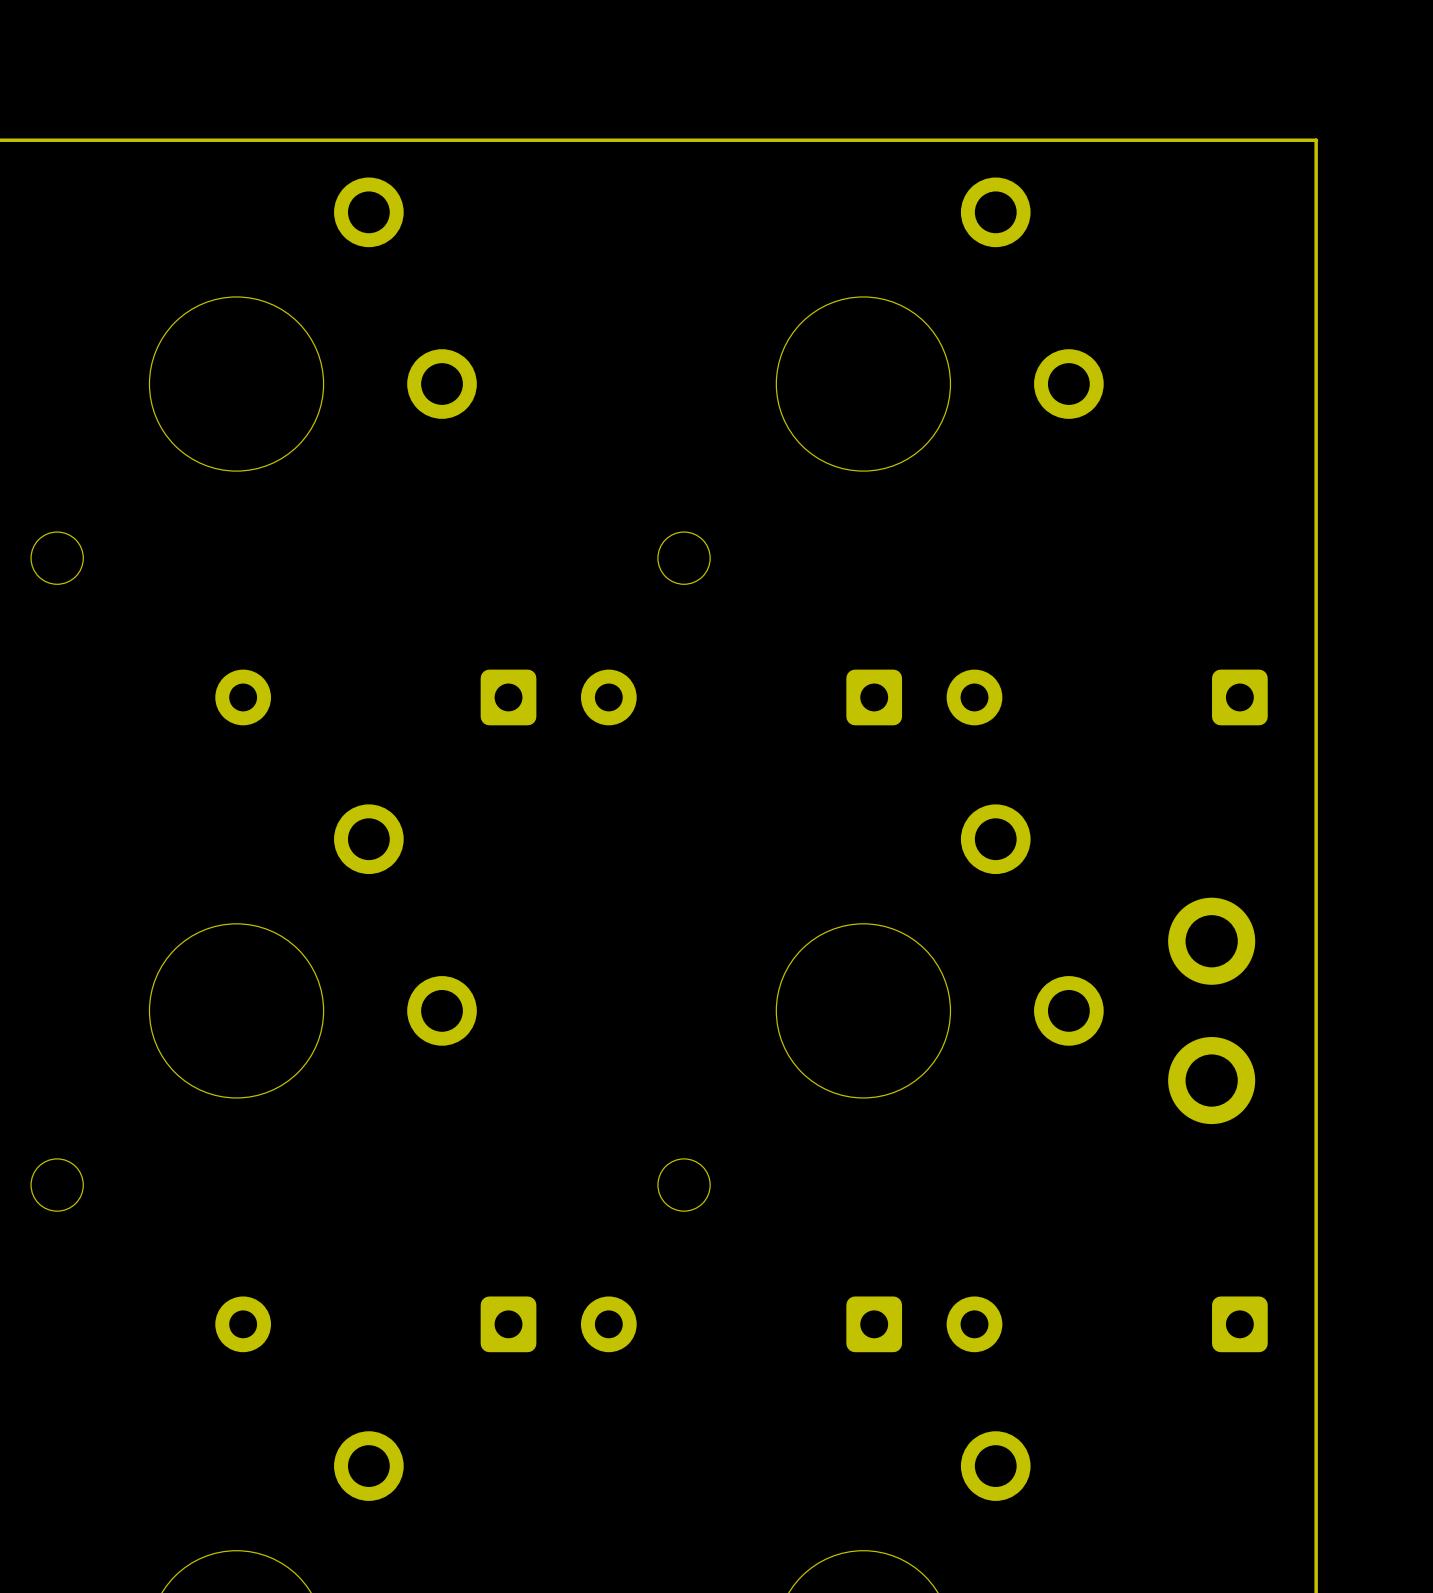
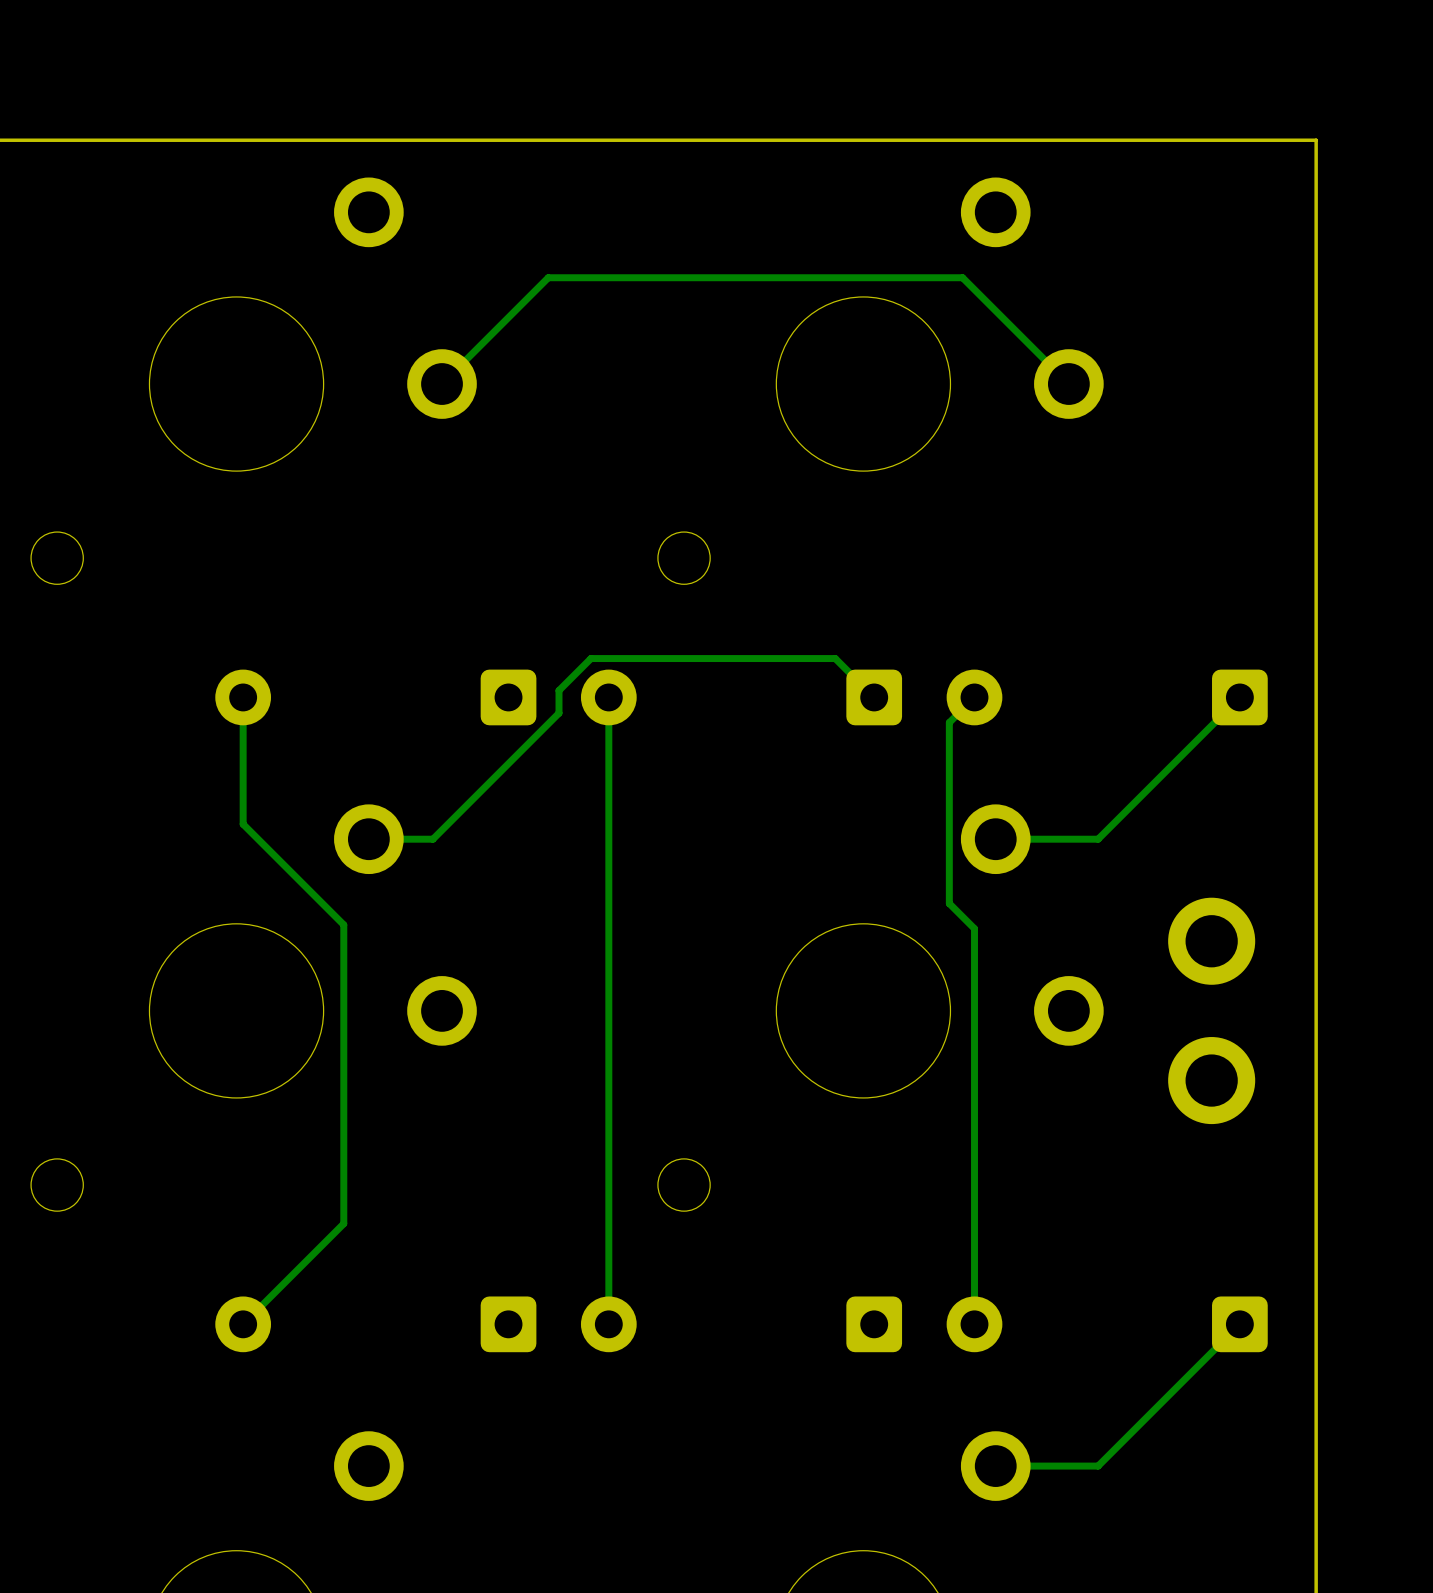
track: none -> (1068, 384) (962, 277) (548, 277) (442, 384)
track: none -> (243, 697) (243, 824) (343, 924) (343, 1223) (243, 1324)
track: none -> (608, 697) (608, 1324)
track: none -> (874, 697) (835, 658) (590, 658) (559, 690) (559, 713) (432, 839) (368, 839)
track: none -> (974, 697) (949, 722) (949, 903) (974, 928) (974, 1324)
track: none -> (1239, 697) (1098, 839) (995, 839)
track: none -> (1239, 1324) (1098, 1466) (995, 1466)

